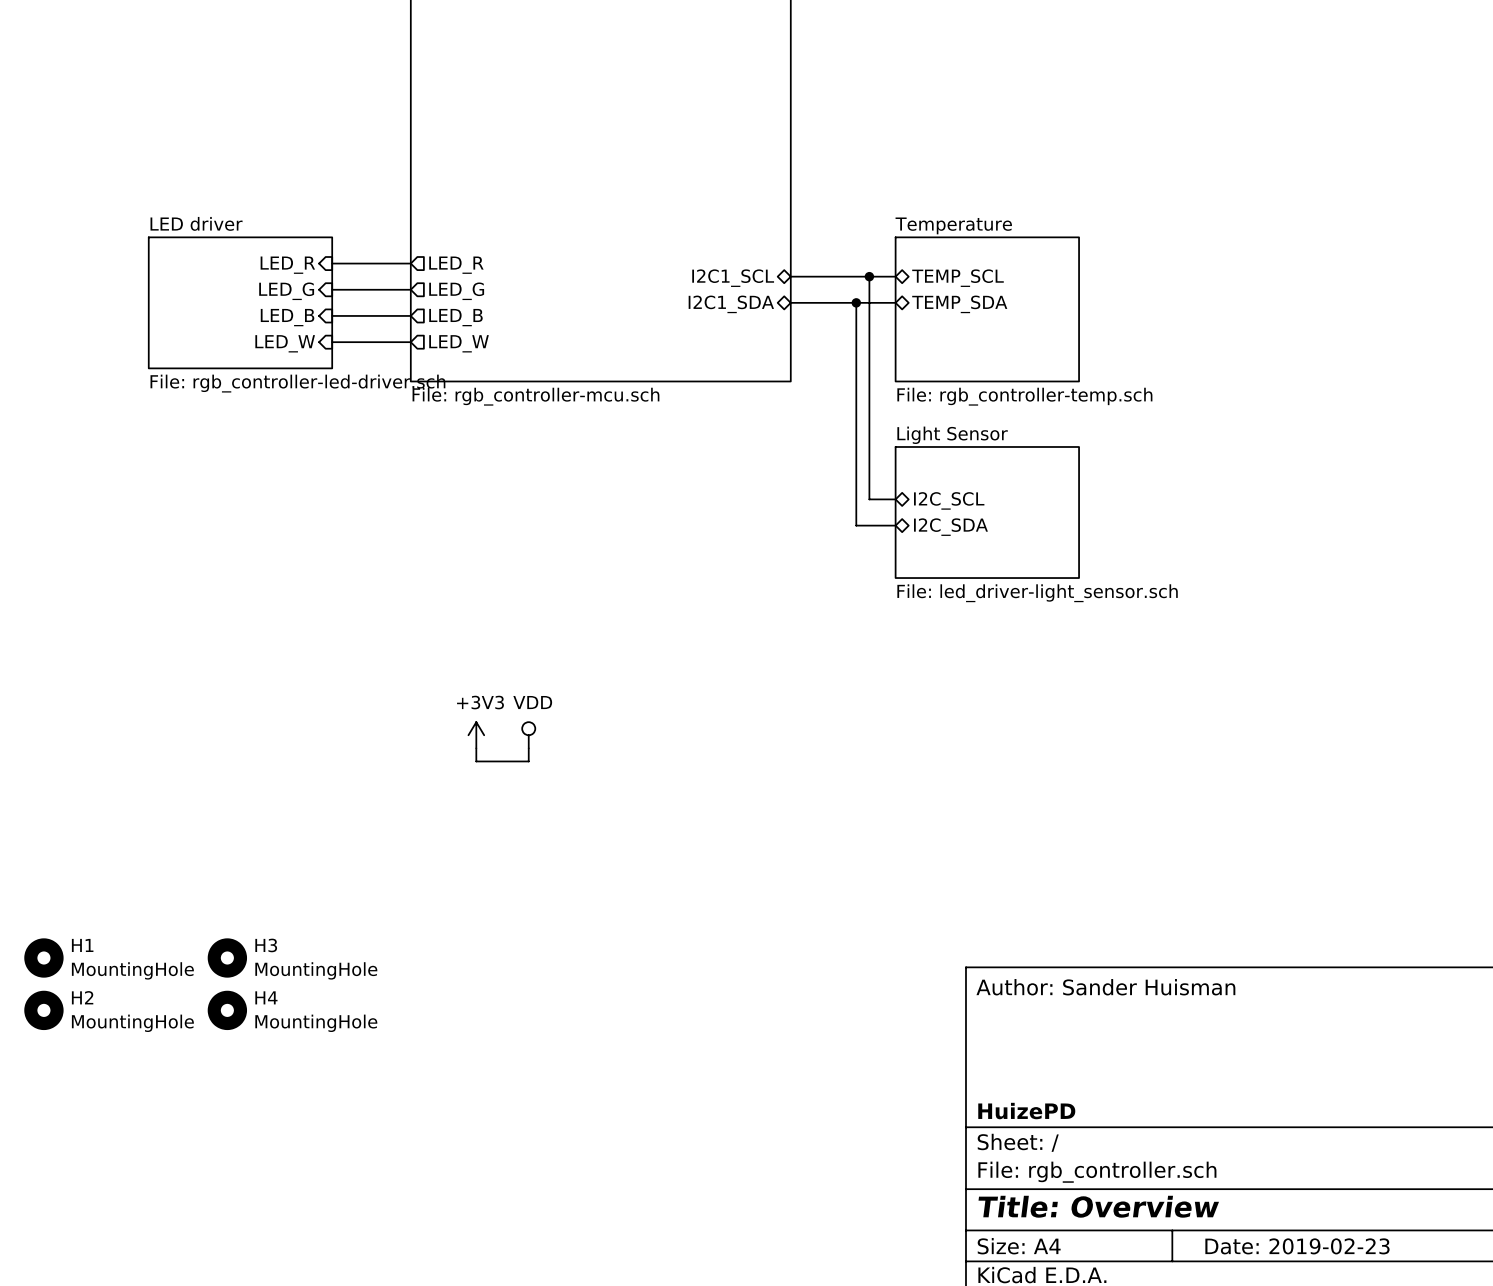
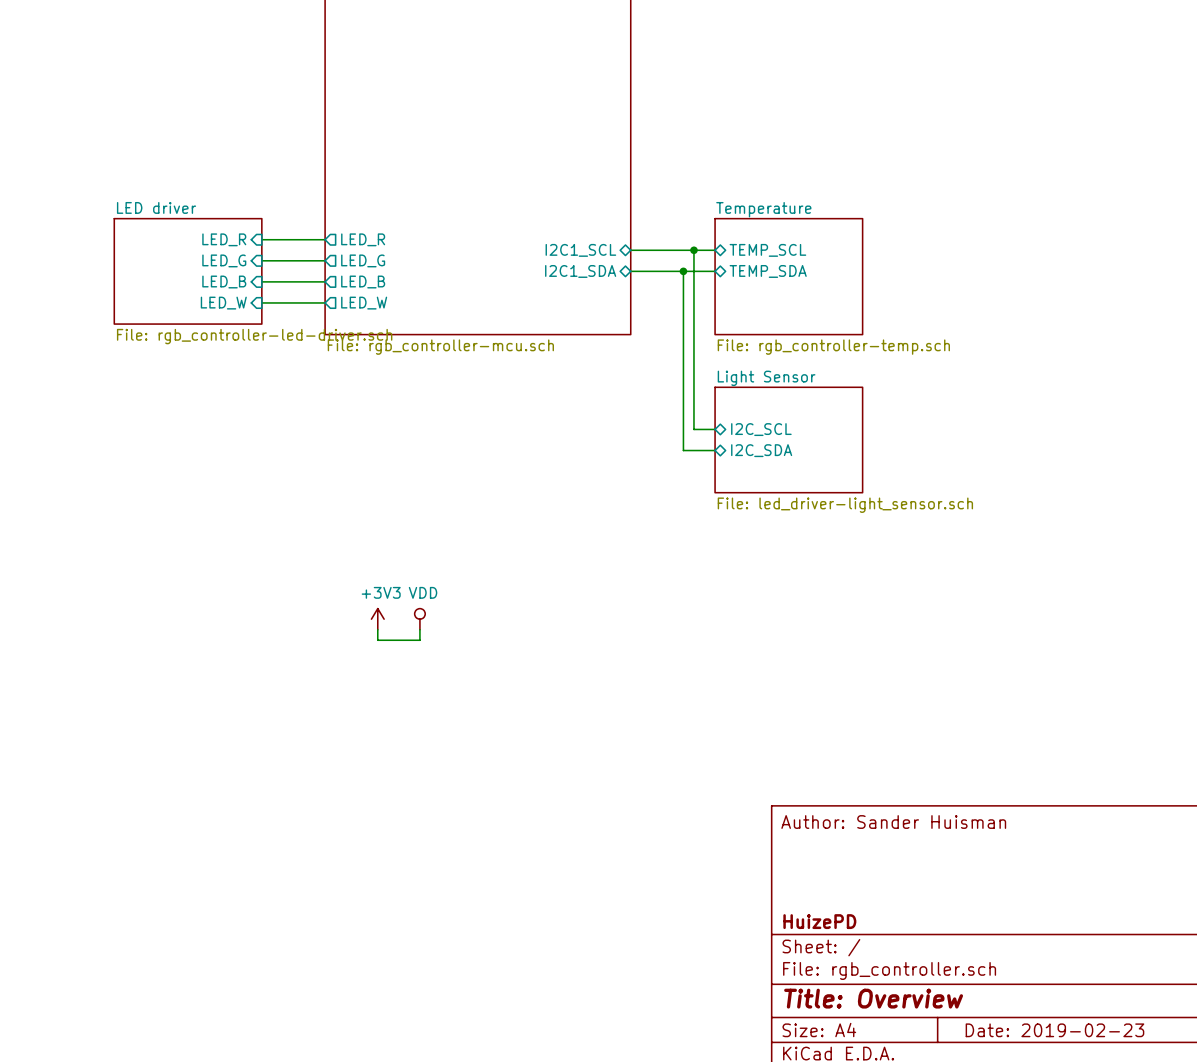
H1: MountingHole (43, 957) -> none
H3: MountingHole (227, 957) -> none
H2: MountingHole (43, 1010) -> none
H4: MountingHole (227, 1010) -> none

